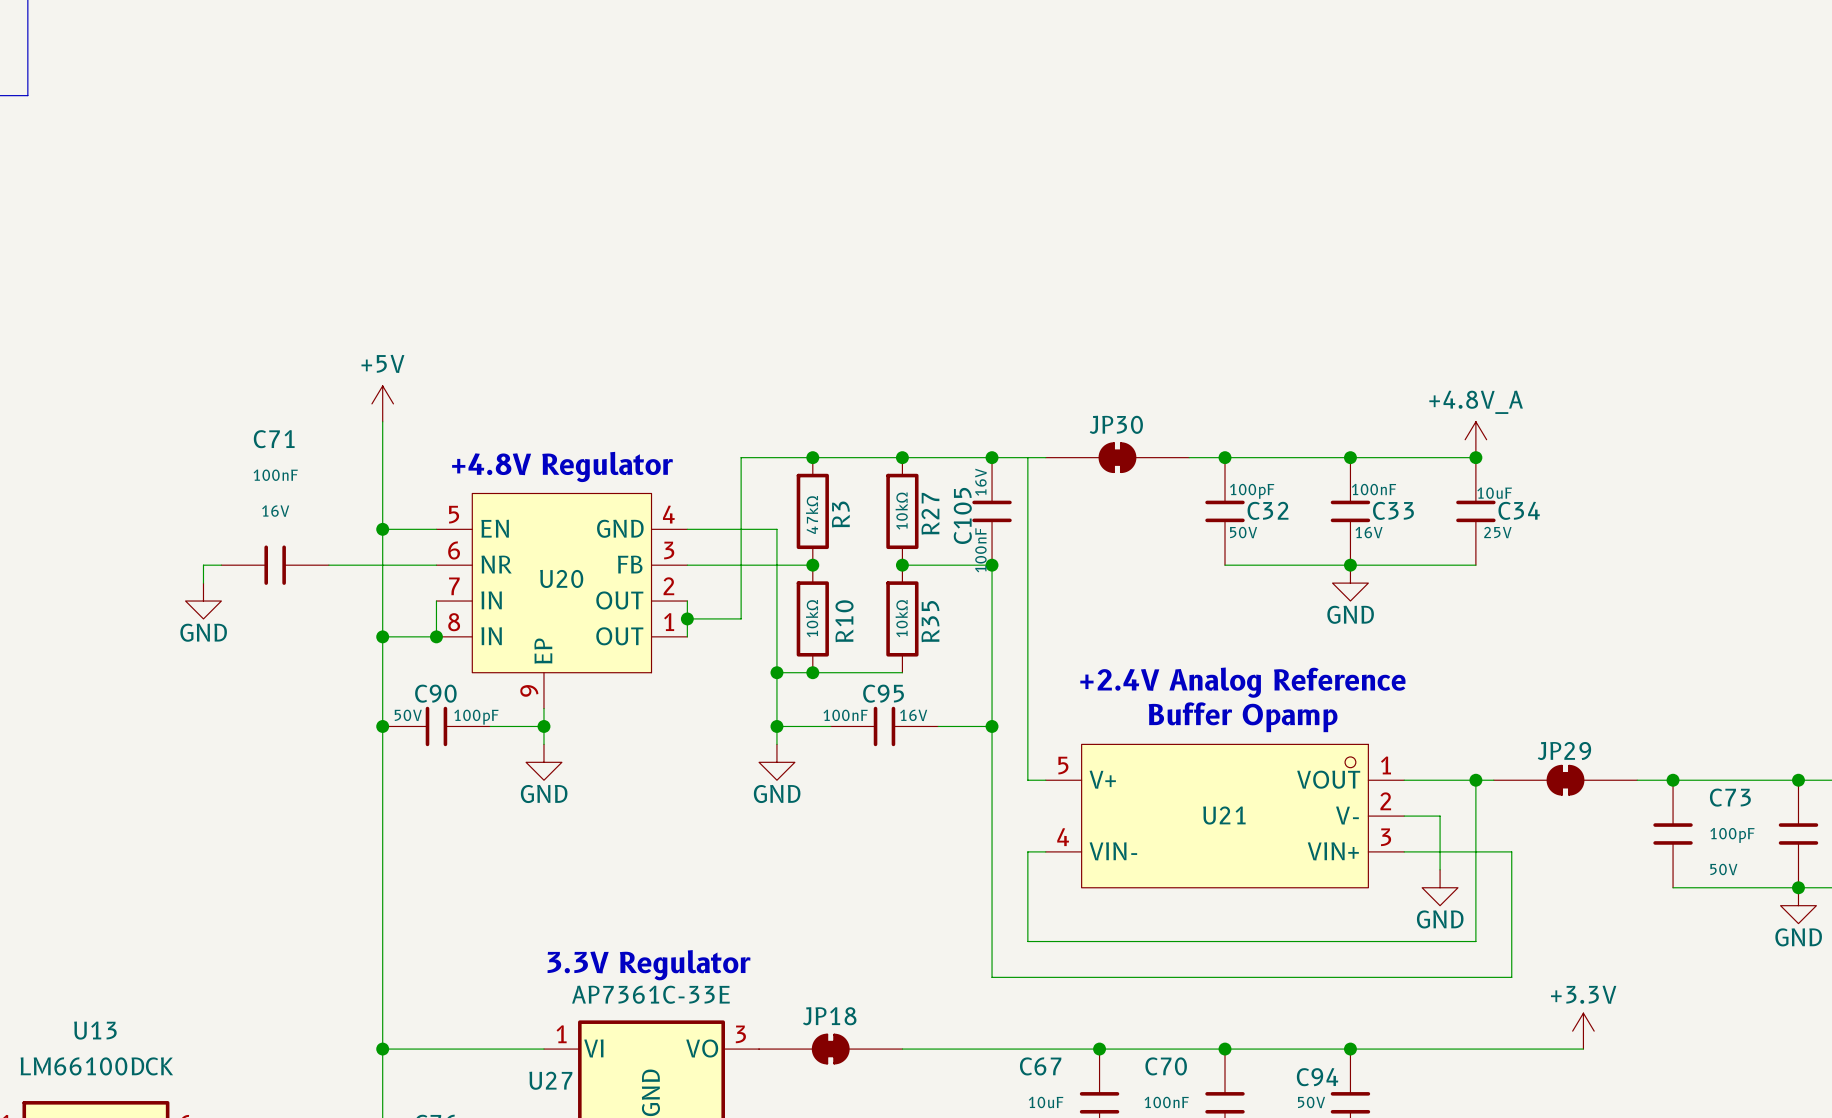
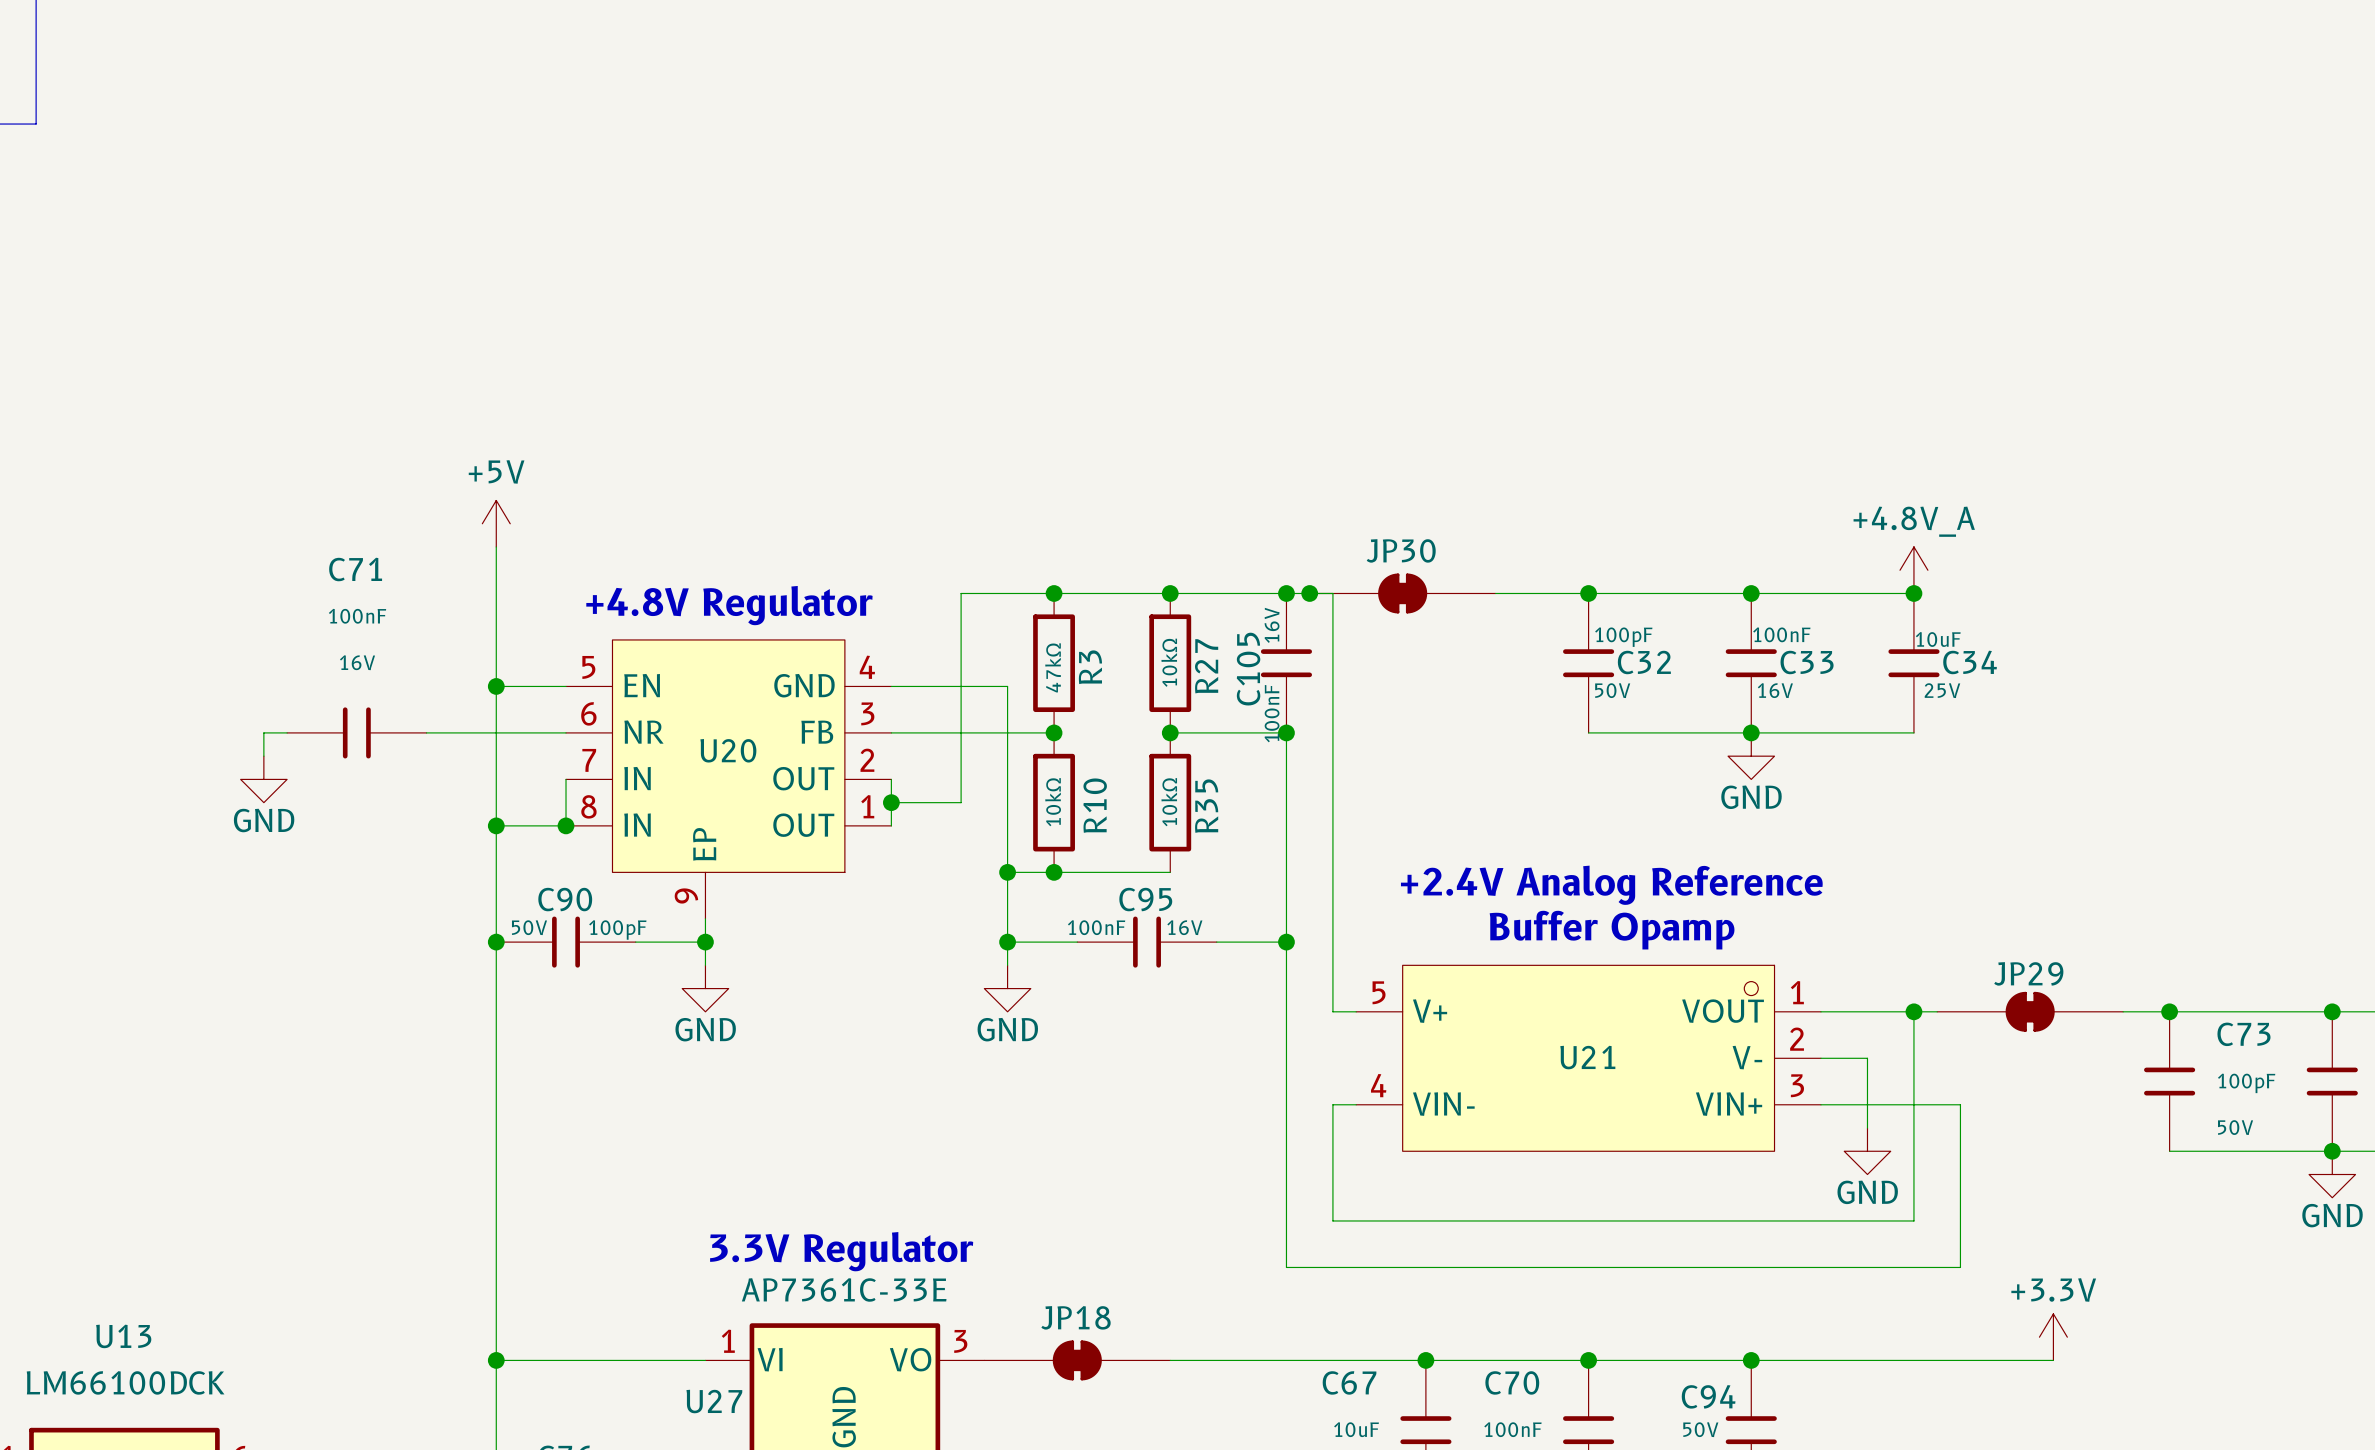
junction: none -> (1309, 593)
JP30 position: (1117, 457) -> (1402, 593)

